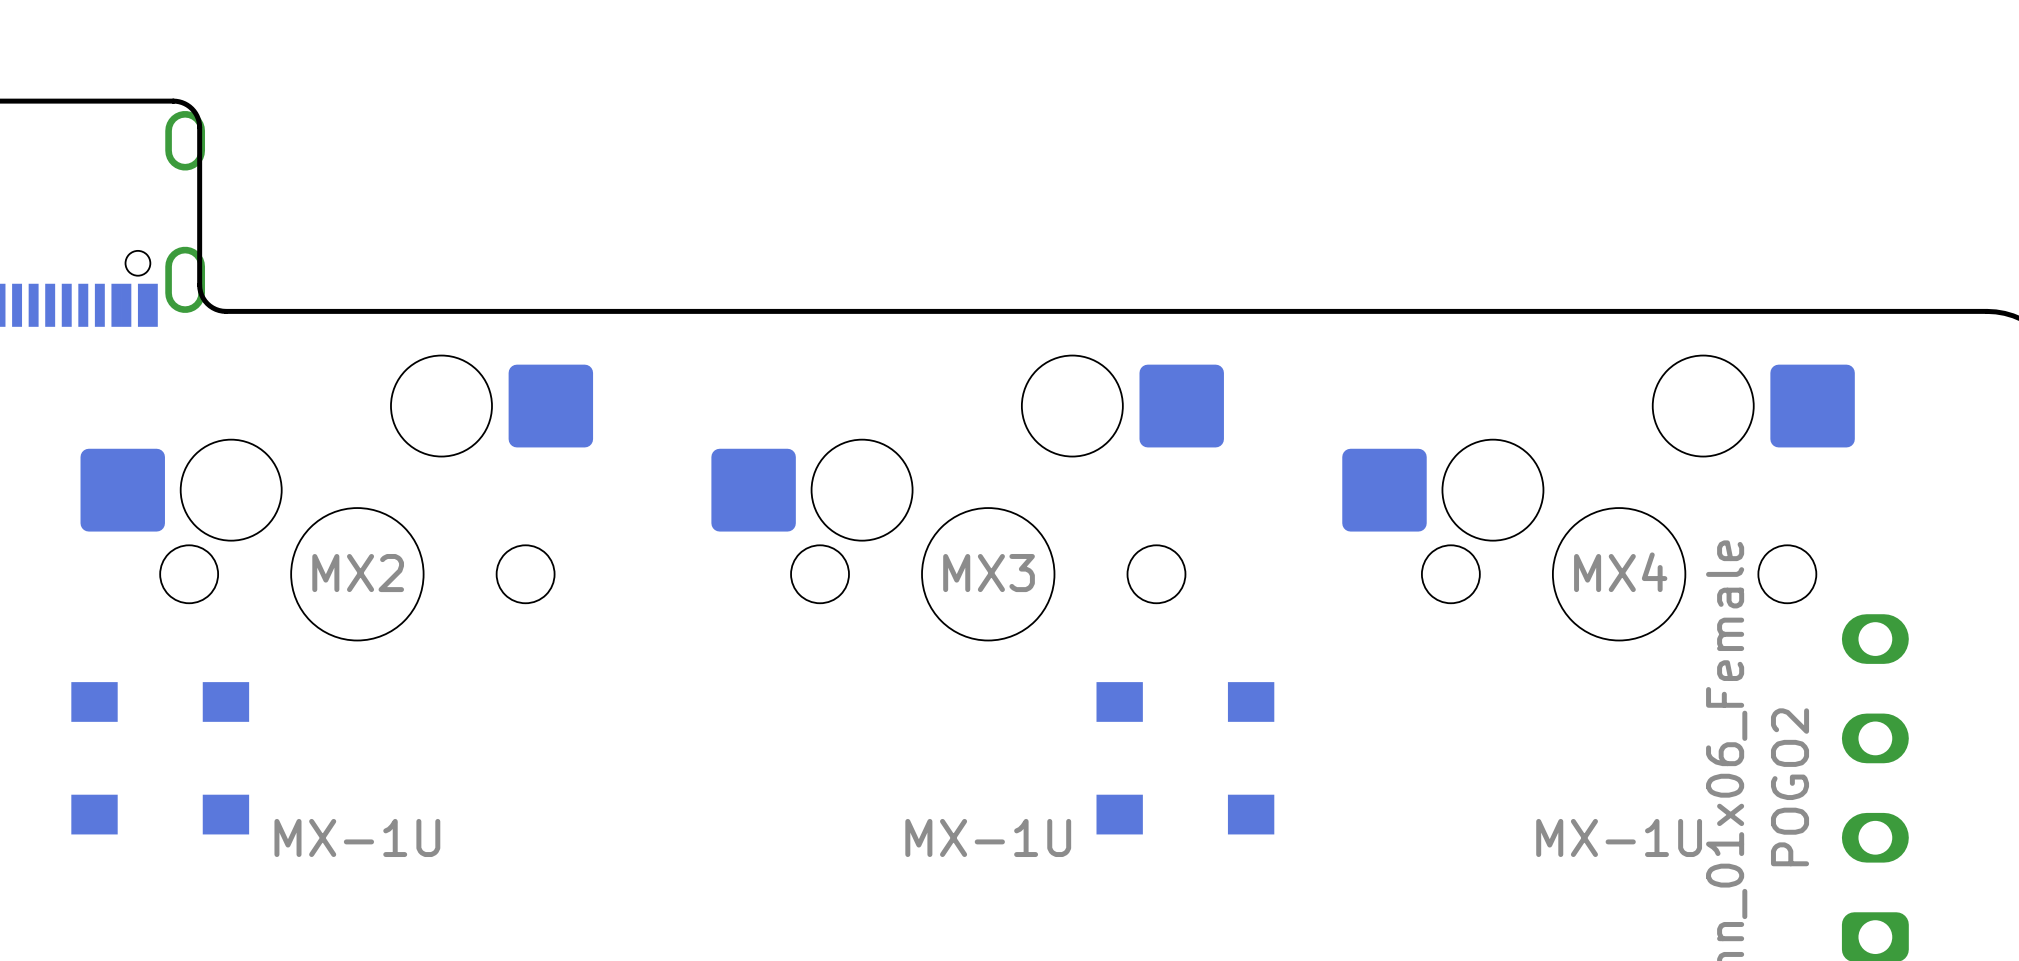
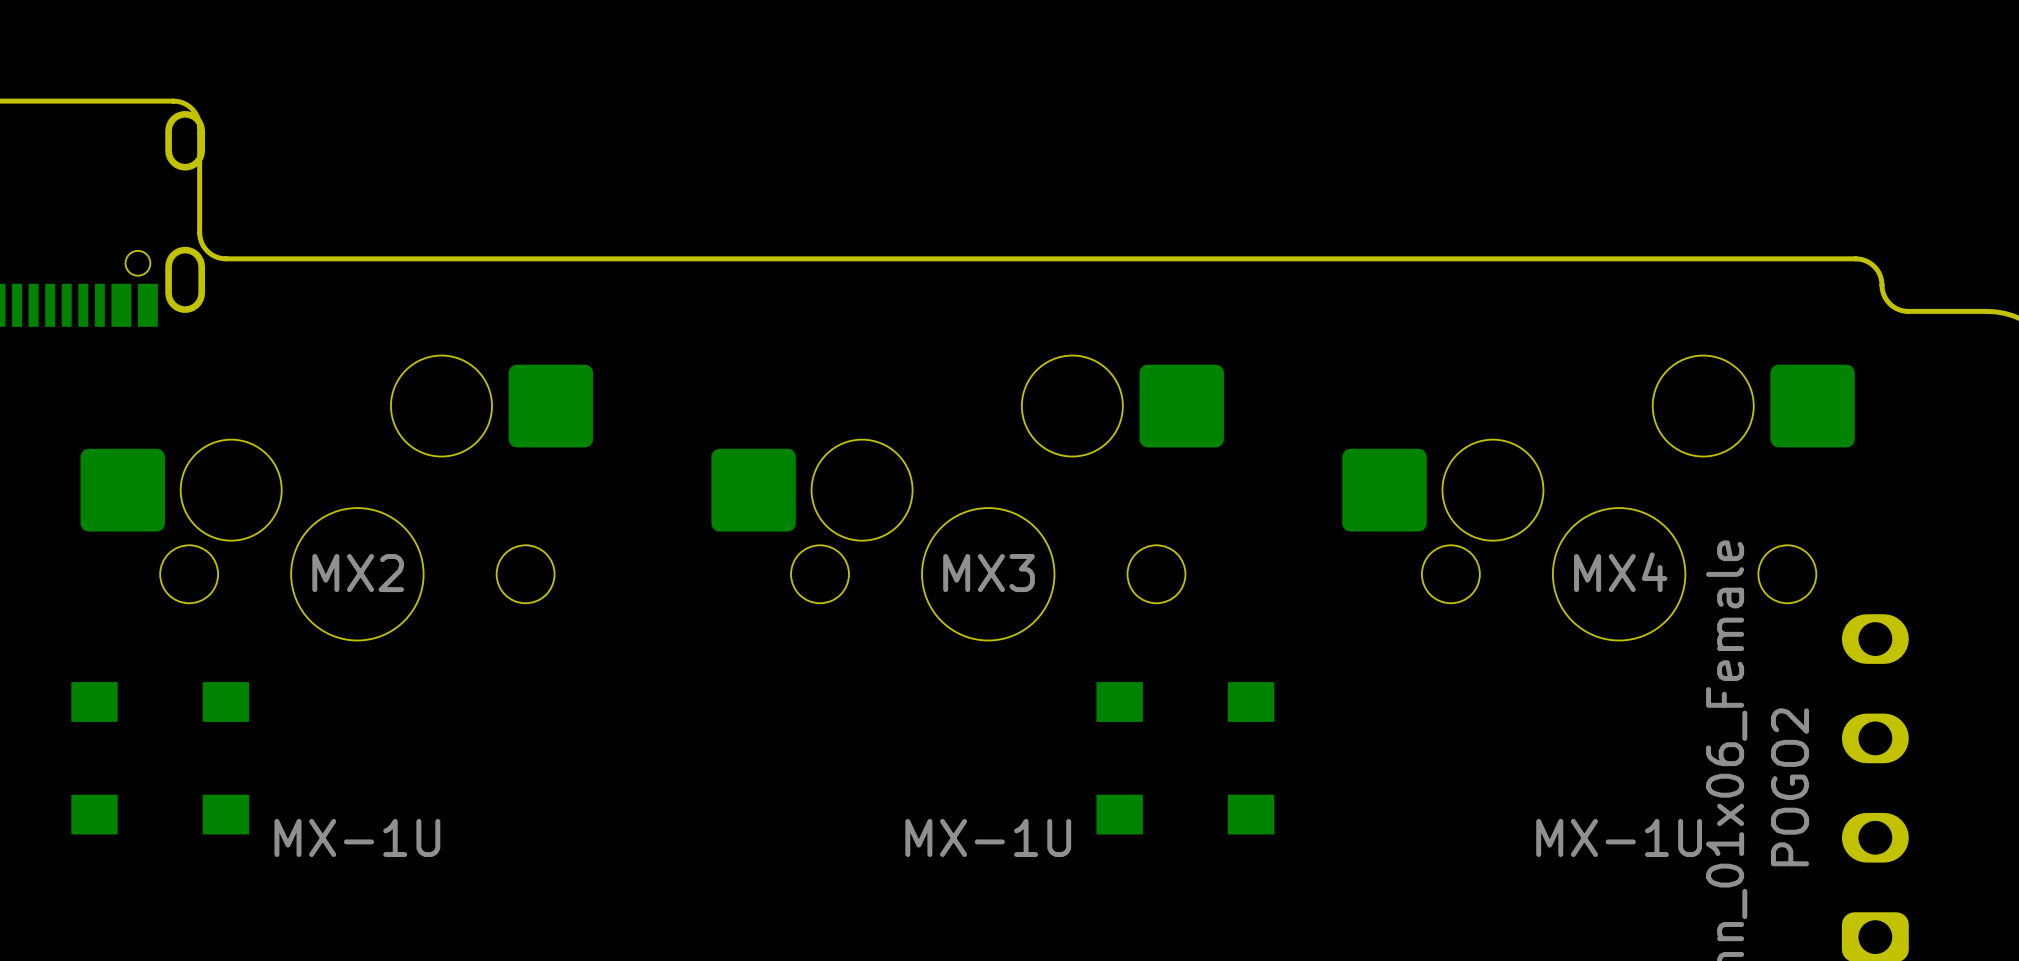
board edge: (199, 232) (200, 291) (209, 305) (225, 311) (1908, 311) -> (199, 232) (201, 242) (207, 251) (215, 256) (225, 258) (1855, 258) (1867, 261) (1874, 266) (1880, 276) (1882, 290) (1887, 301) (1896, 308) (1908, 311)

